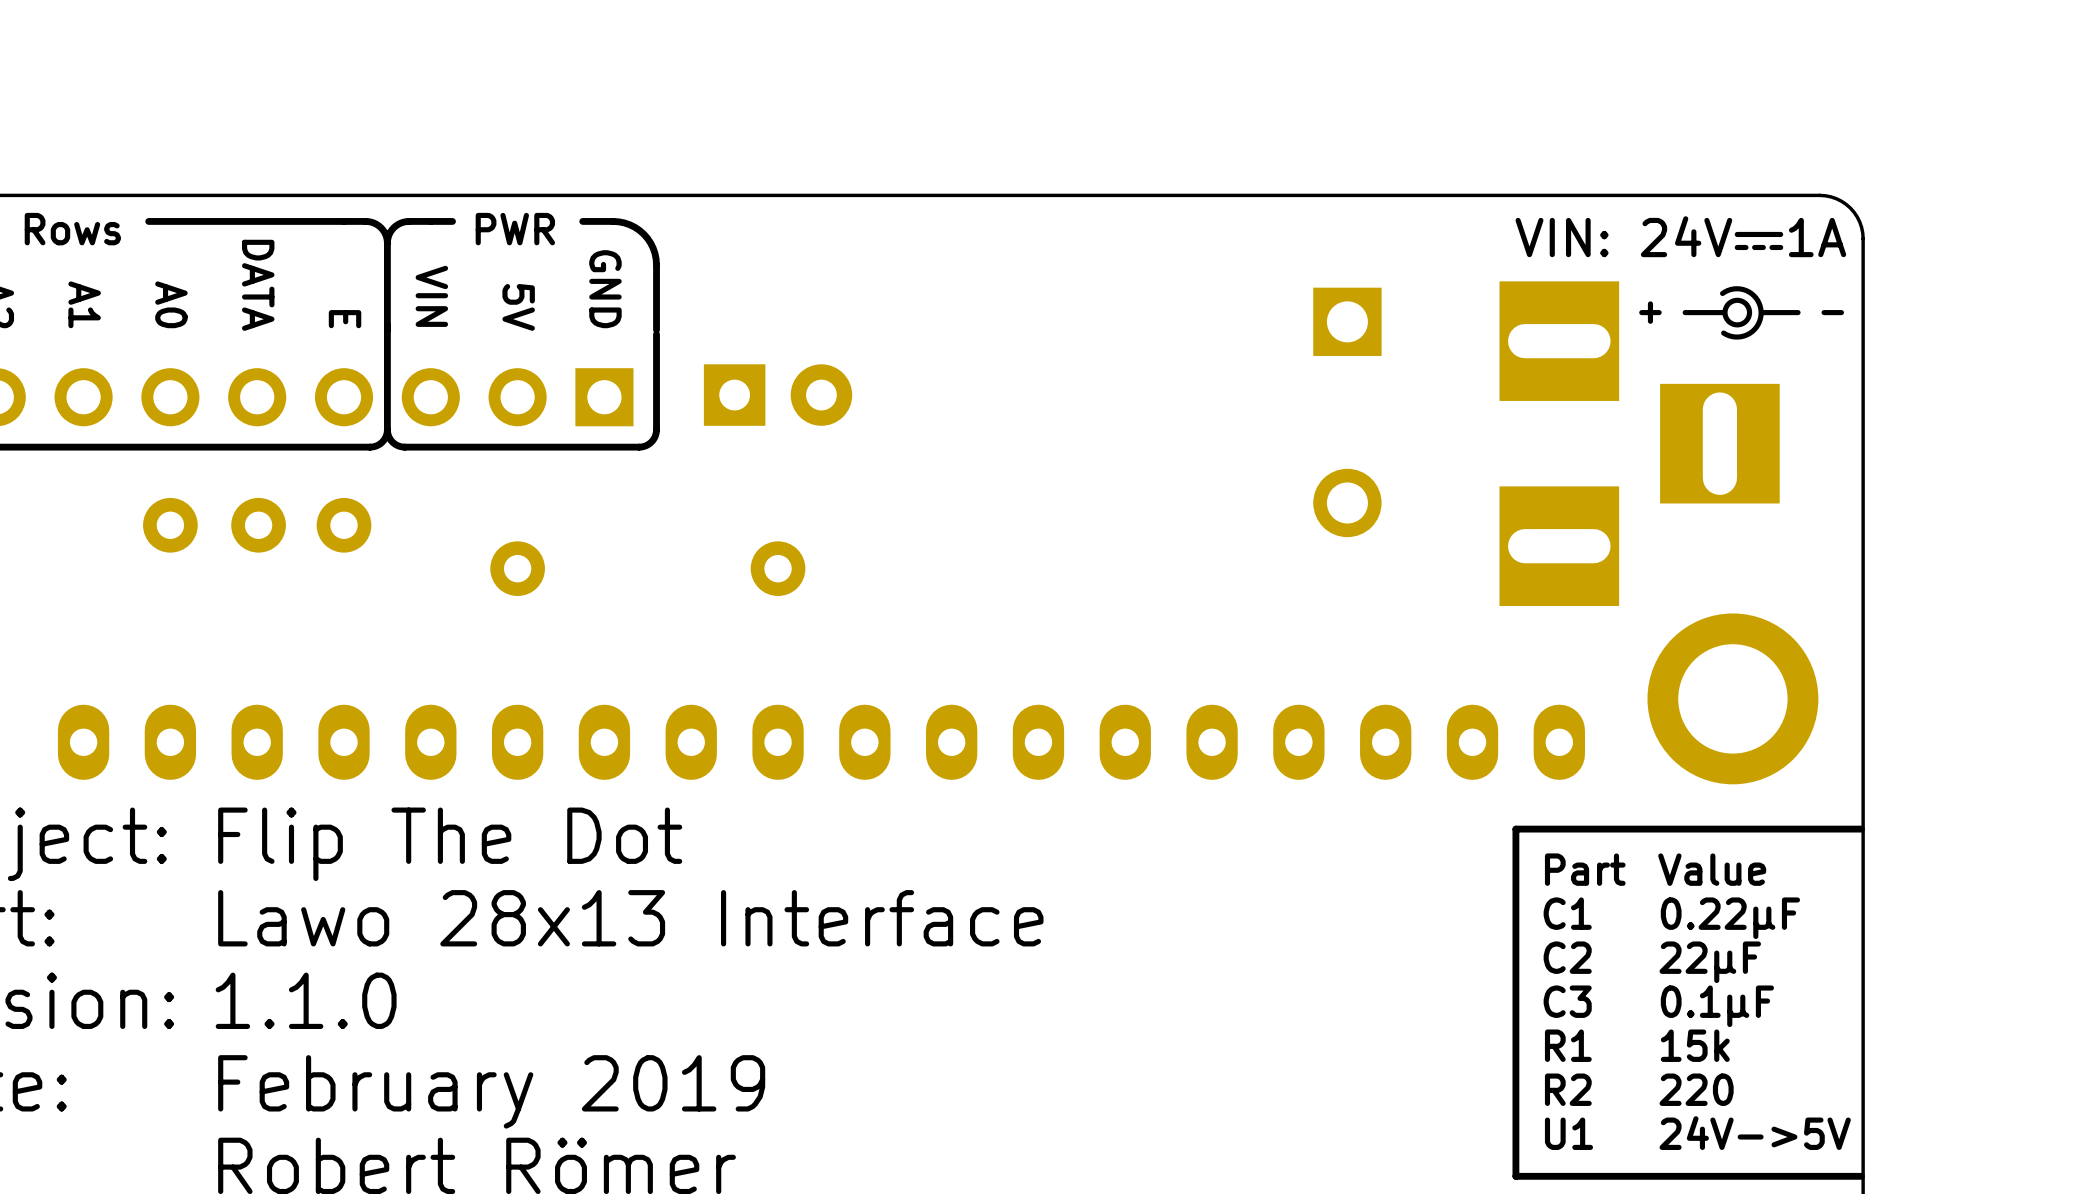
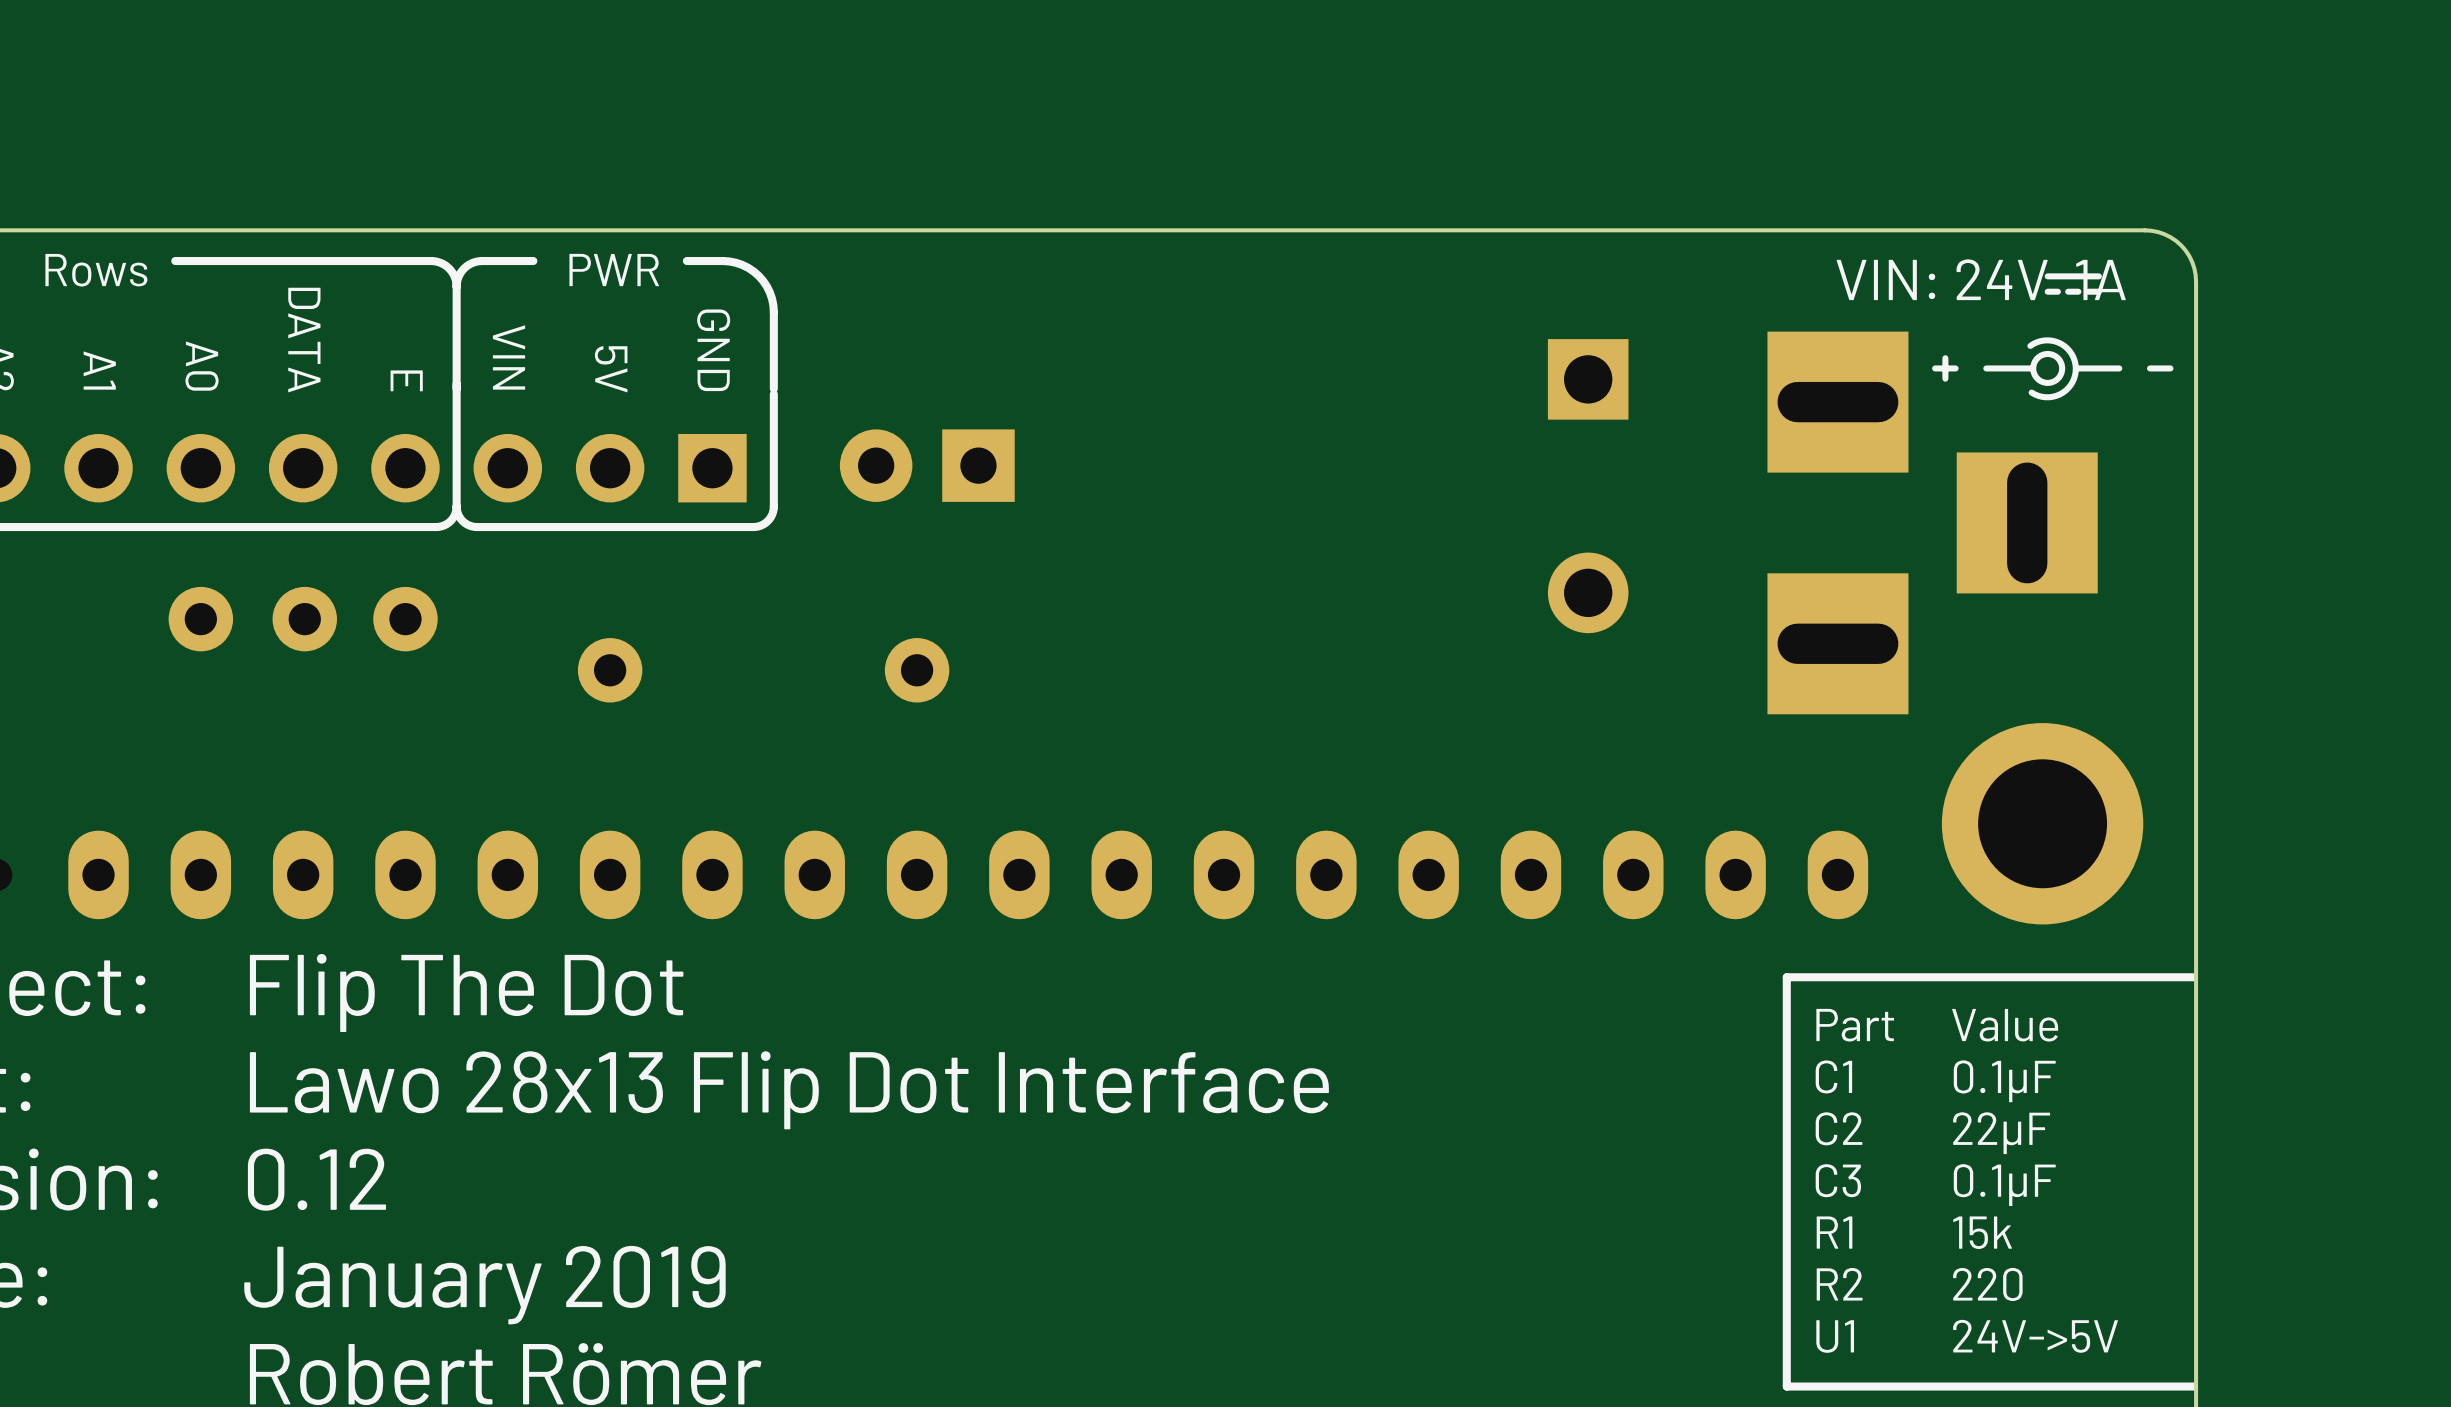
part rotation: 0° (778, 395) -> 180° (927, 465)
text: Lawo 28x13 Interface (630, 918) -> Lawo 28x13 Flip Dot Interface (789, 1090)
text: 0.22μF (1730, 918) -> 0.1μF (2004, 1081)
text: 1.1.0 (306, 1000) -> 0.12 (316, 1179)
text: February 2019 (491, 1091) -> January 2019 (484, 1285)

